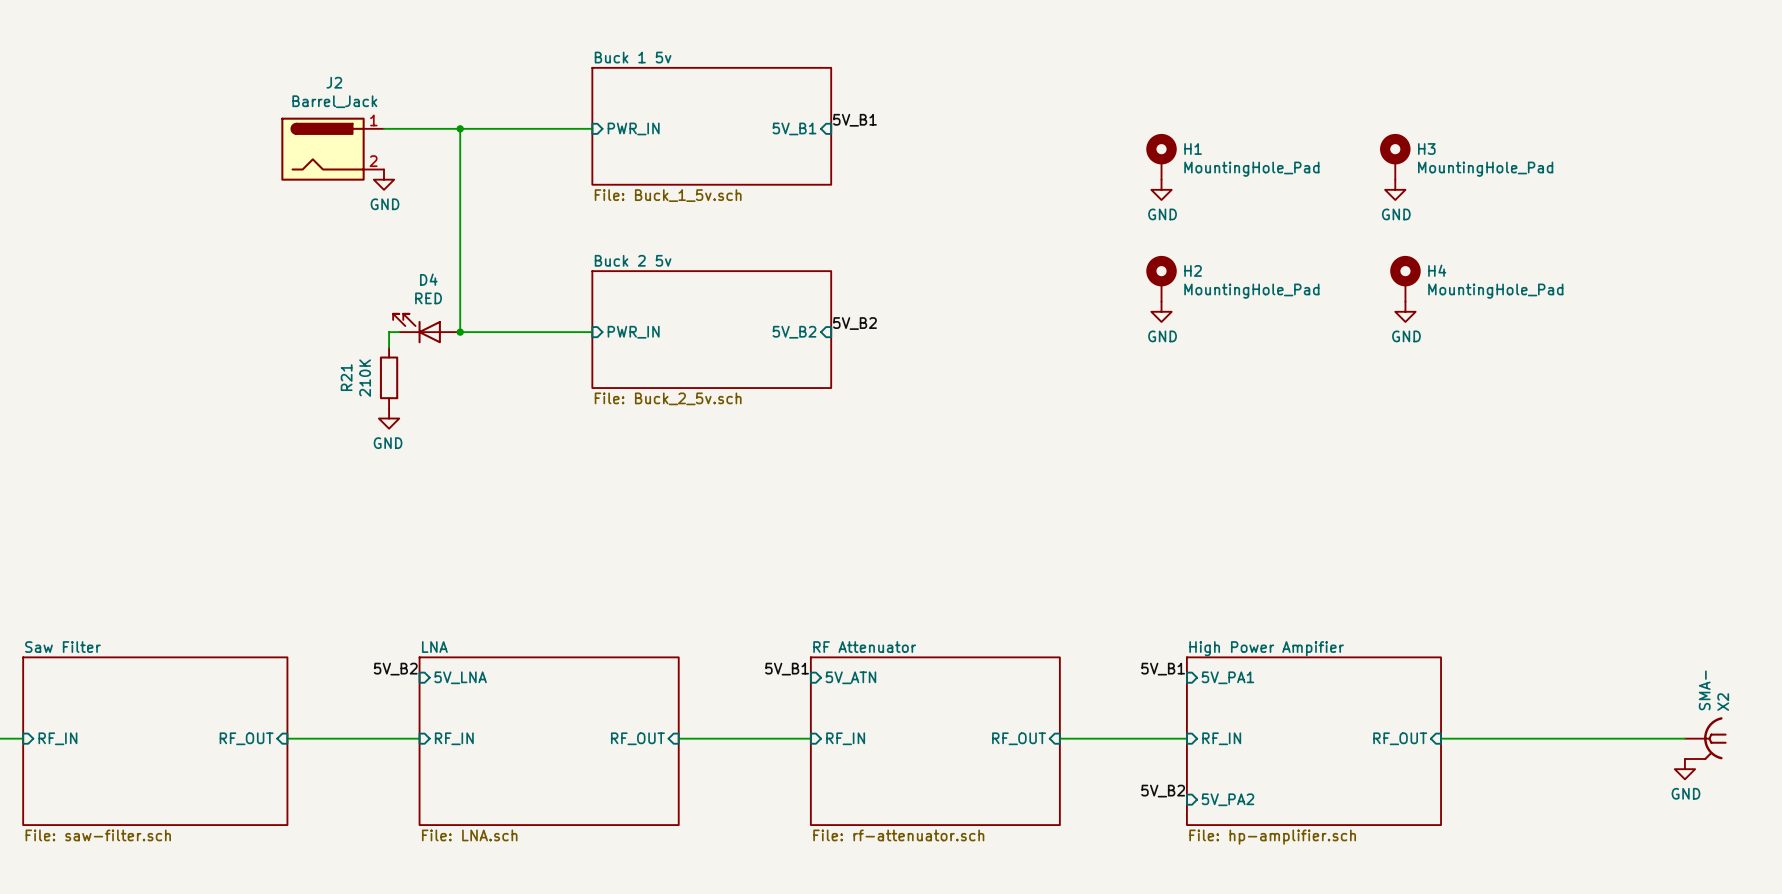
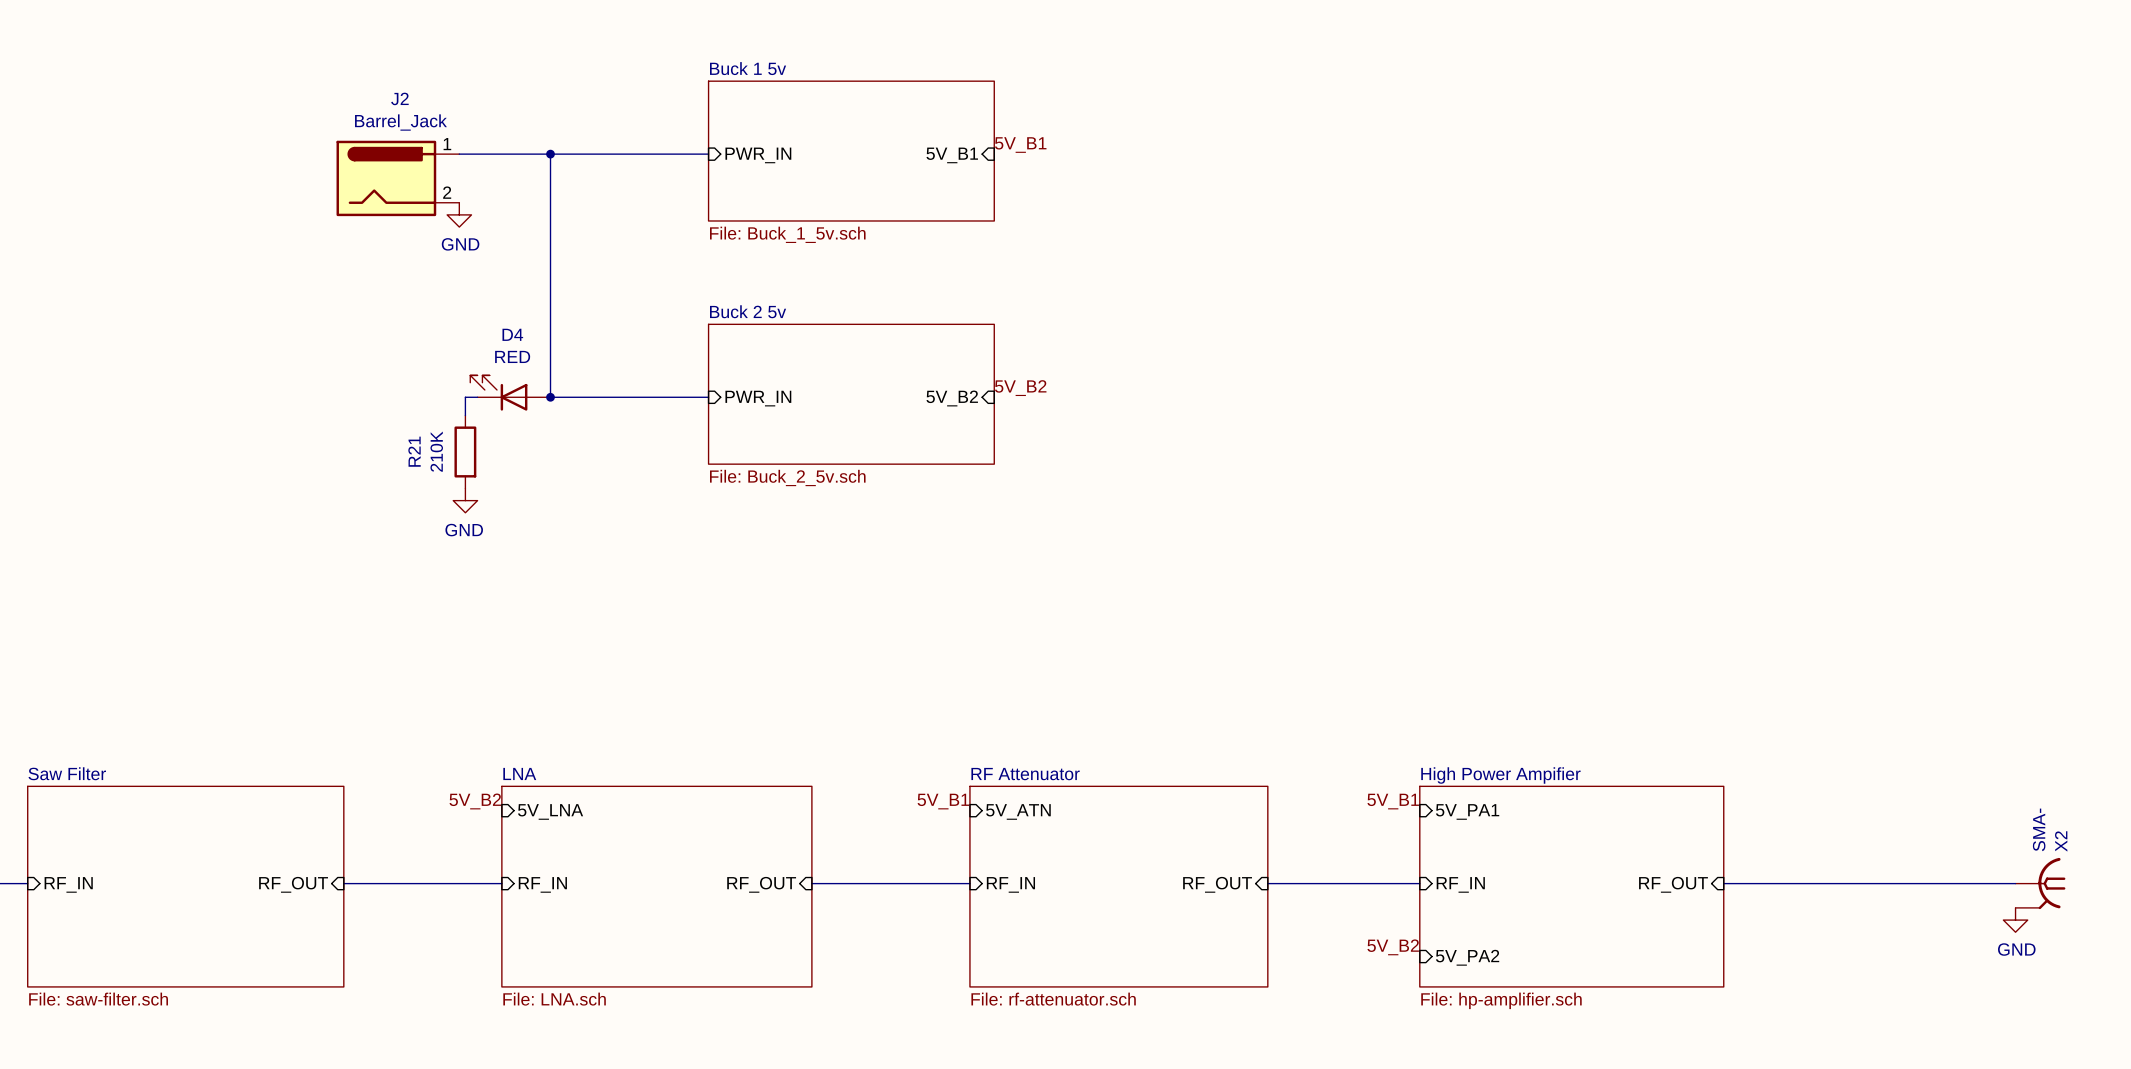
H1: MountingHole_Pad (1161, 156) -> none
H3: MountingHole_Pad (1395, 156) -> none
power symbol: GND (1161, 189) -> none
power symbol: GND (1395, 189) -> none
H2: MountingHole_Pad (1161, 278) -> none
H4: MountingHole_Pad (1405, 278) -> none
power symbol: GND (1161, 311) -> none
power symbol: GND (1405, 311) -> none

